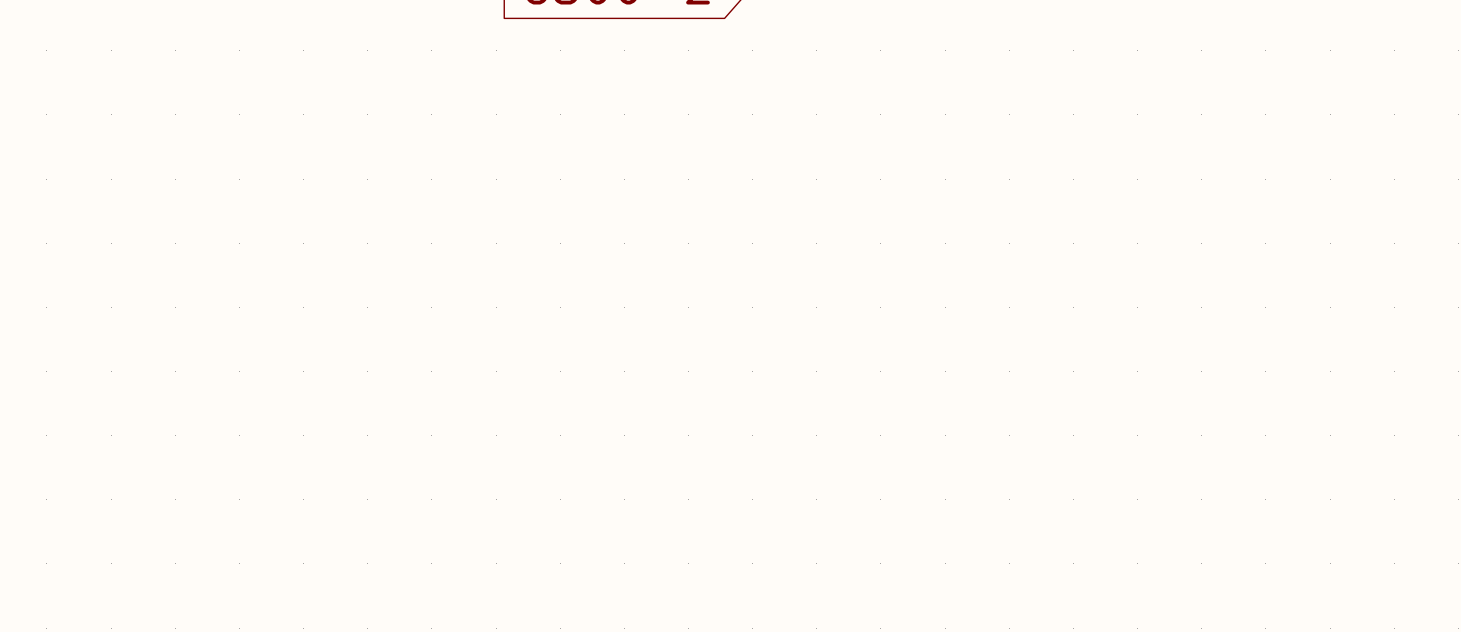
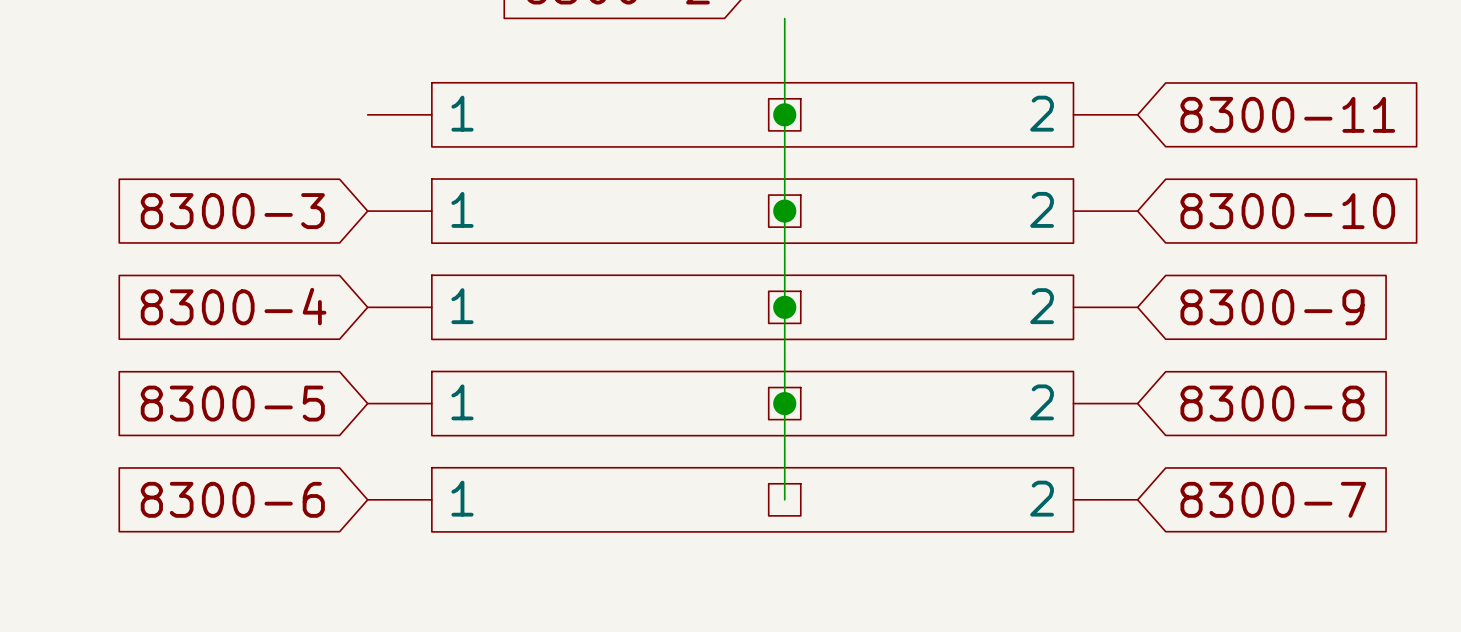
wire: none -> (784, 18) (784, 499)
part: none -> (752, 114)
junction: none -> (784, 114)
global label: none -> 8300-11 (1287, 114)
global label: none -> 8300-3 (232, 211)
part: none -> (752, 211)
junction: none -> (784, 211)
global label: none -> 8300-10 (1287, 211)
global label: none -> 8300-4 (233, 306)
part: none -> (752, 307)
junction: none -> (784, 307)
global label: none -> 8300-9 (1272, 307)
global label: none -> 8300-5 (232, 403)
part: none -> (752, 403)
junction: none -> (784, 403)
global label: none -> 8300-8 (1272, 403)
global label: none -> 8300-6 (232, 499)
part: none -> (752, 499)
global label: none -> 8300-7 (1273, 499)

